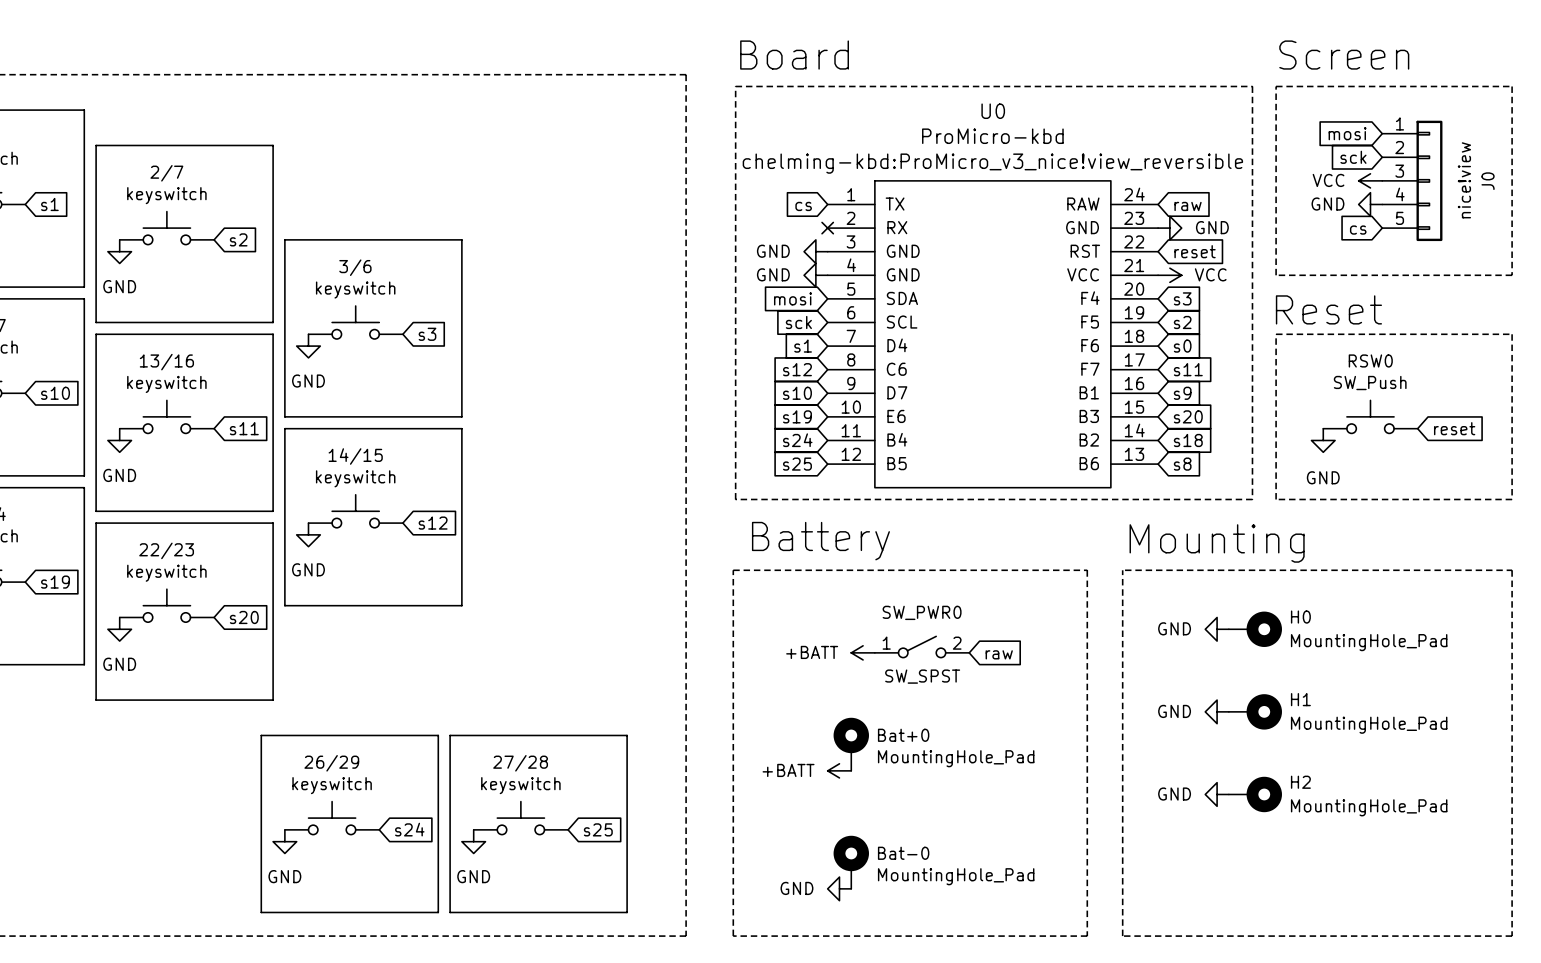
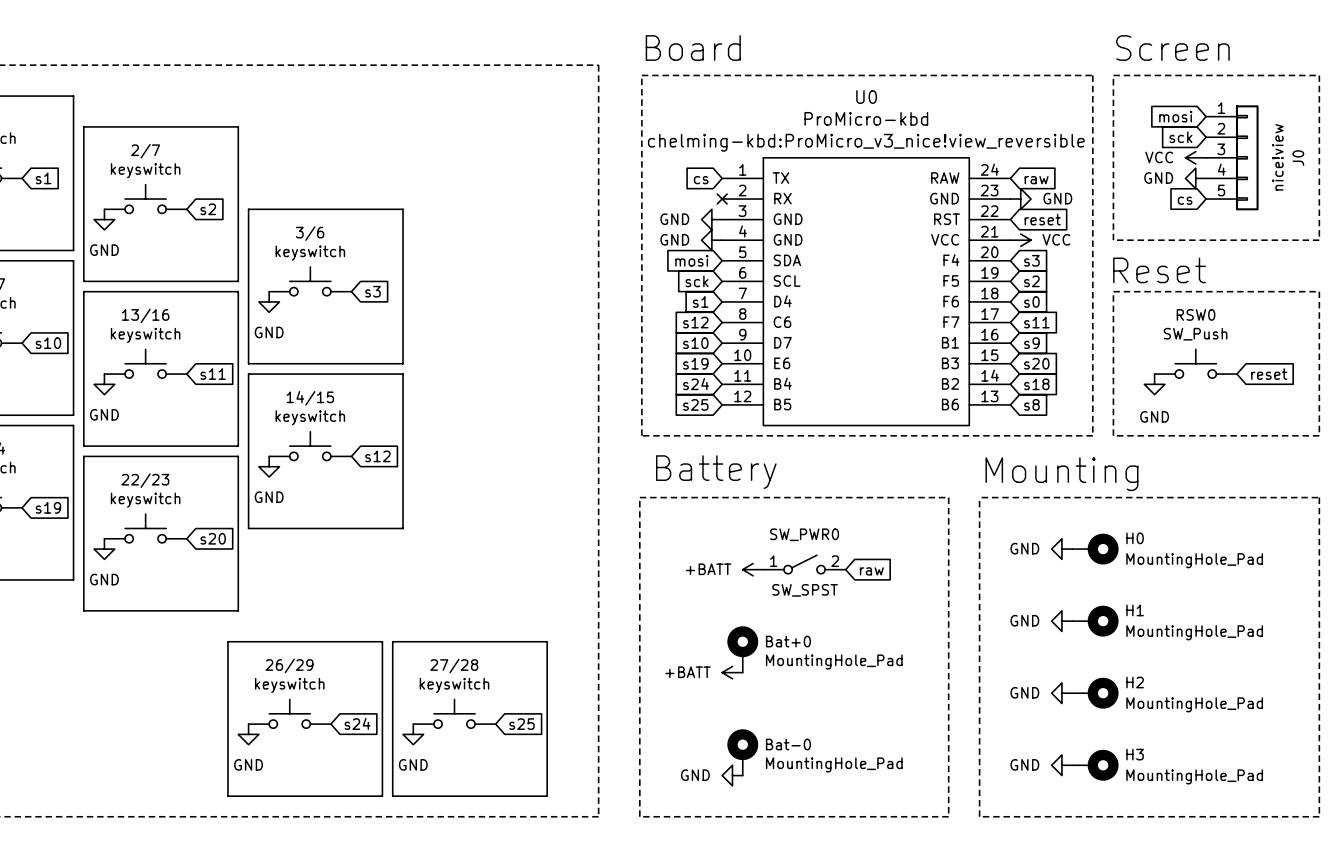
power symbol: none -> GND (1061, 765)
H3: none -> MountingHole_Pad (1095, 765)

